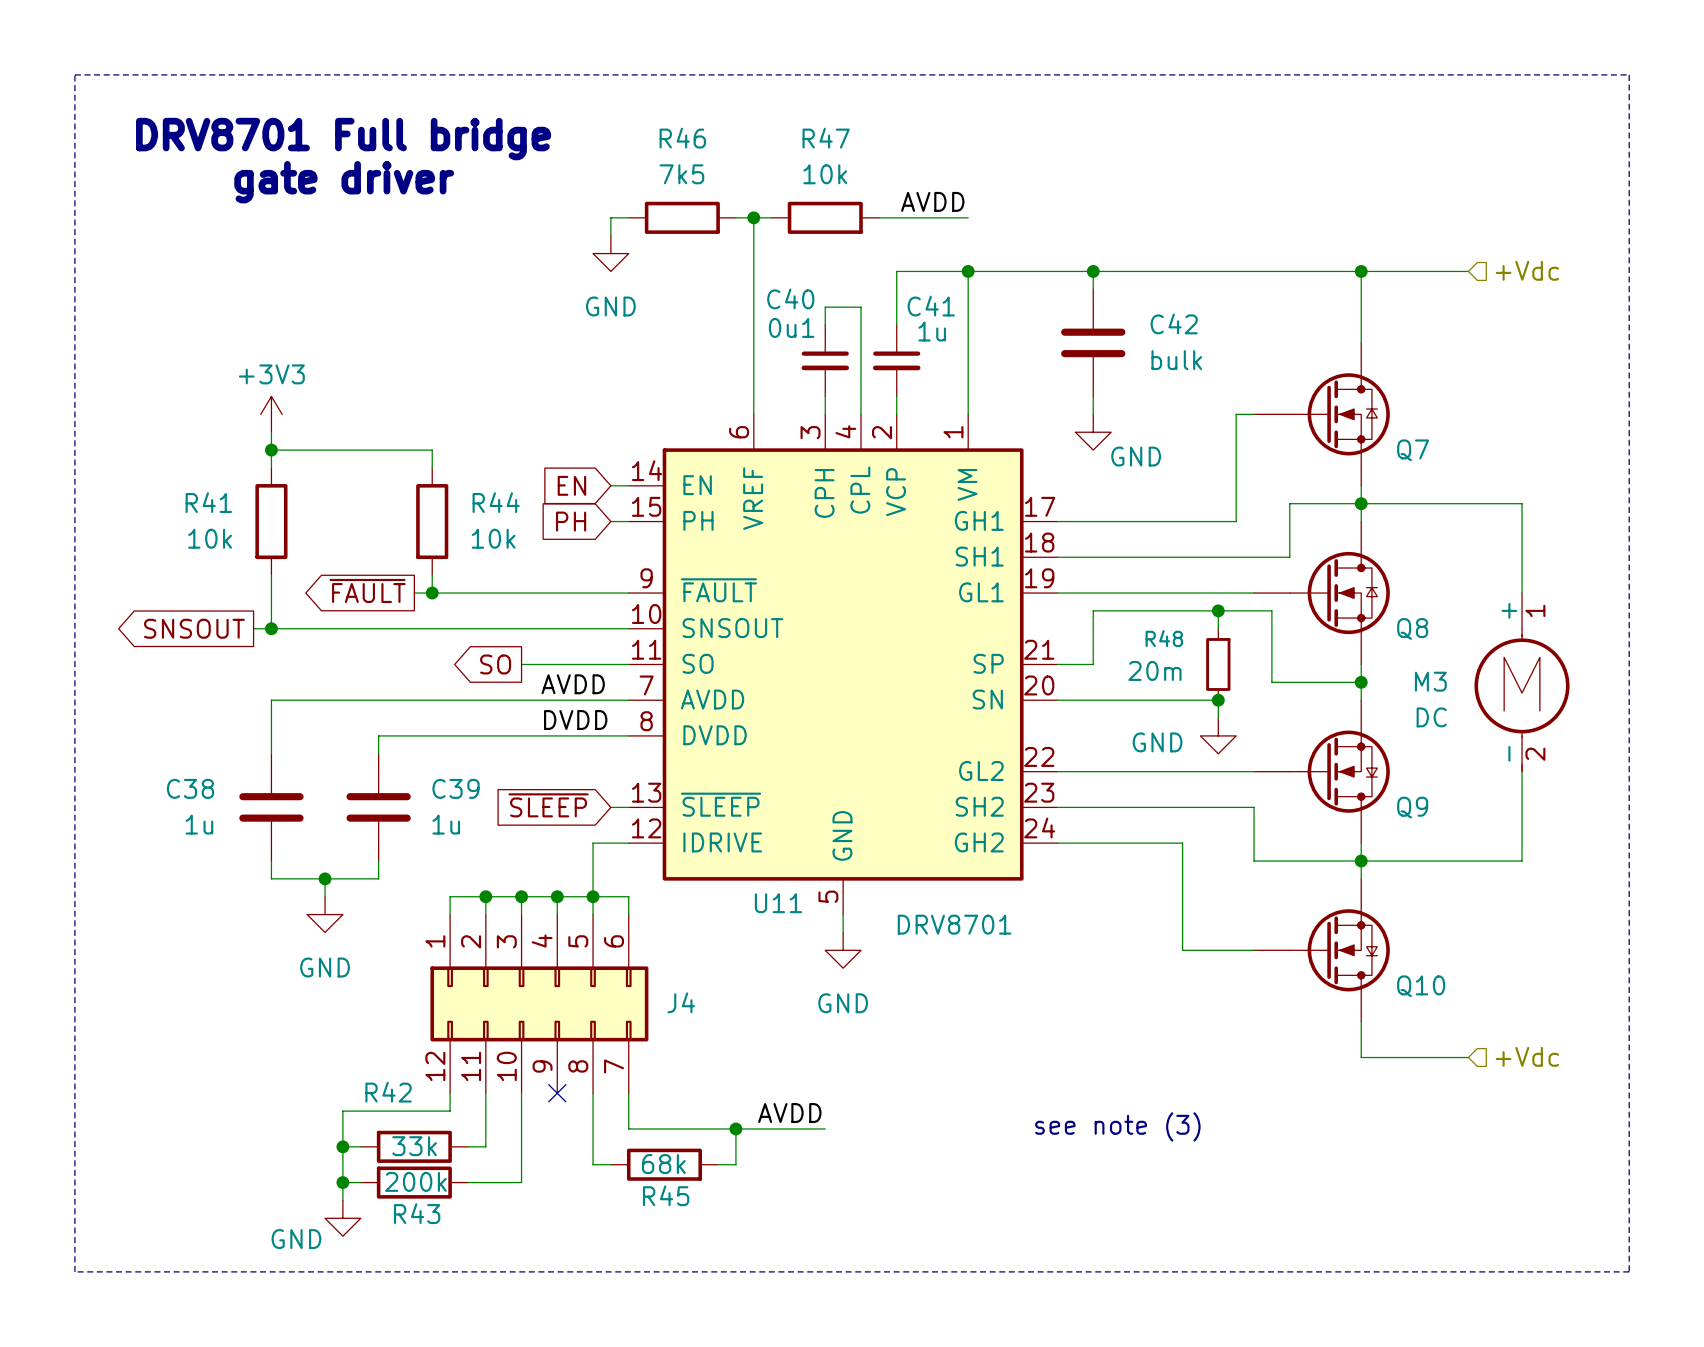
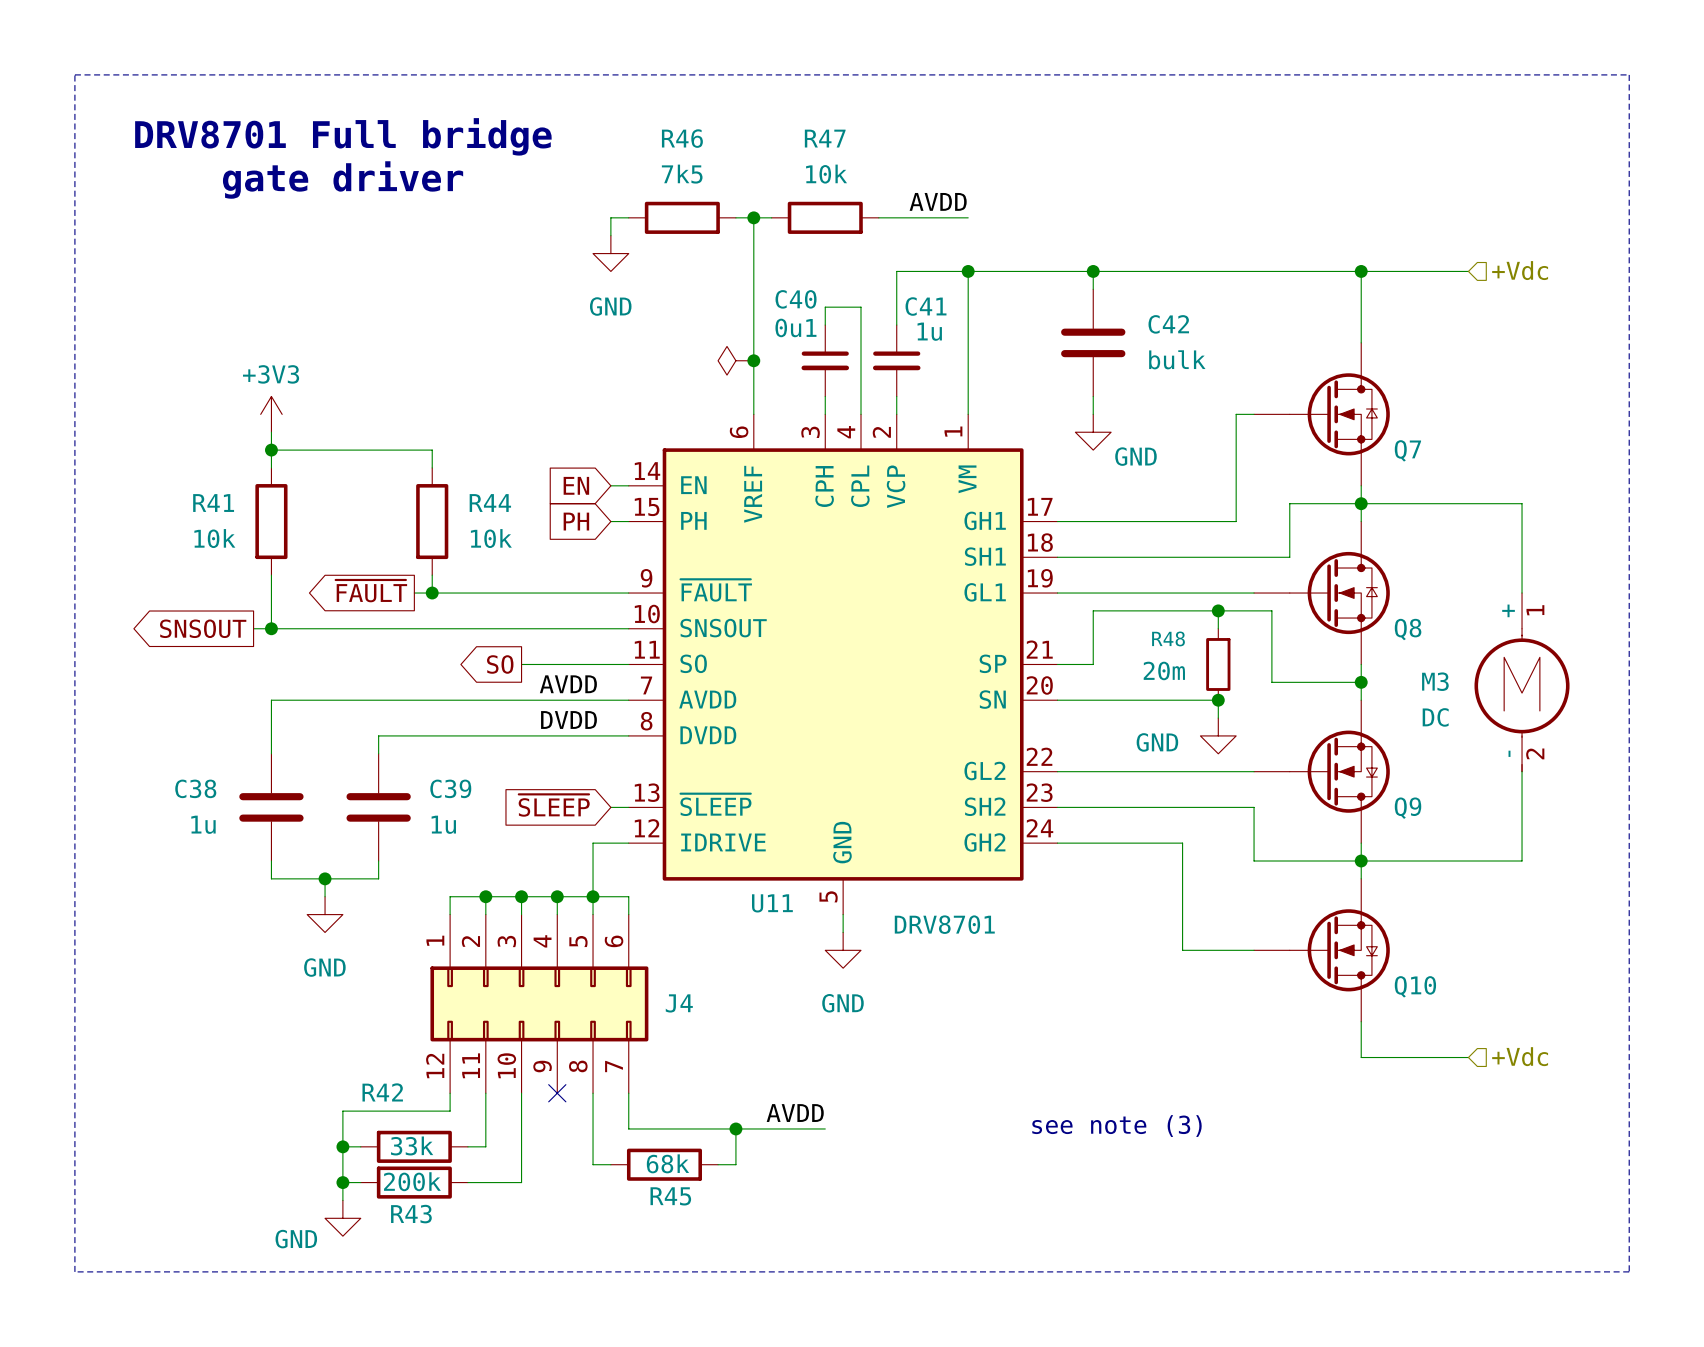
power symbol: none -> (735, 360)
junction: none -> (753, 360)

